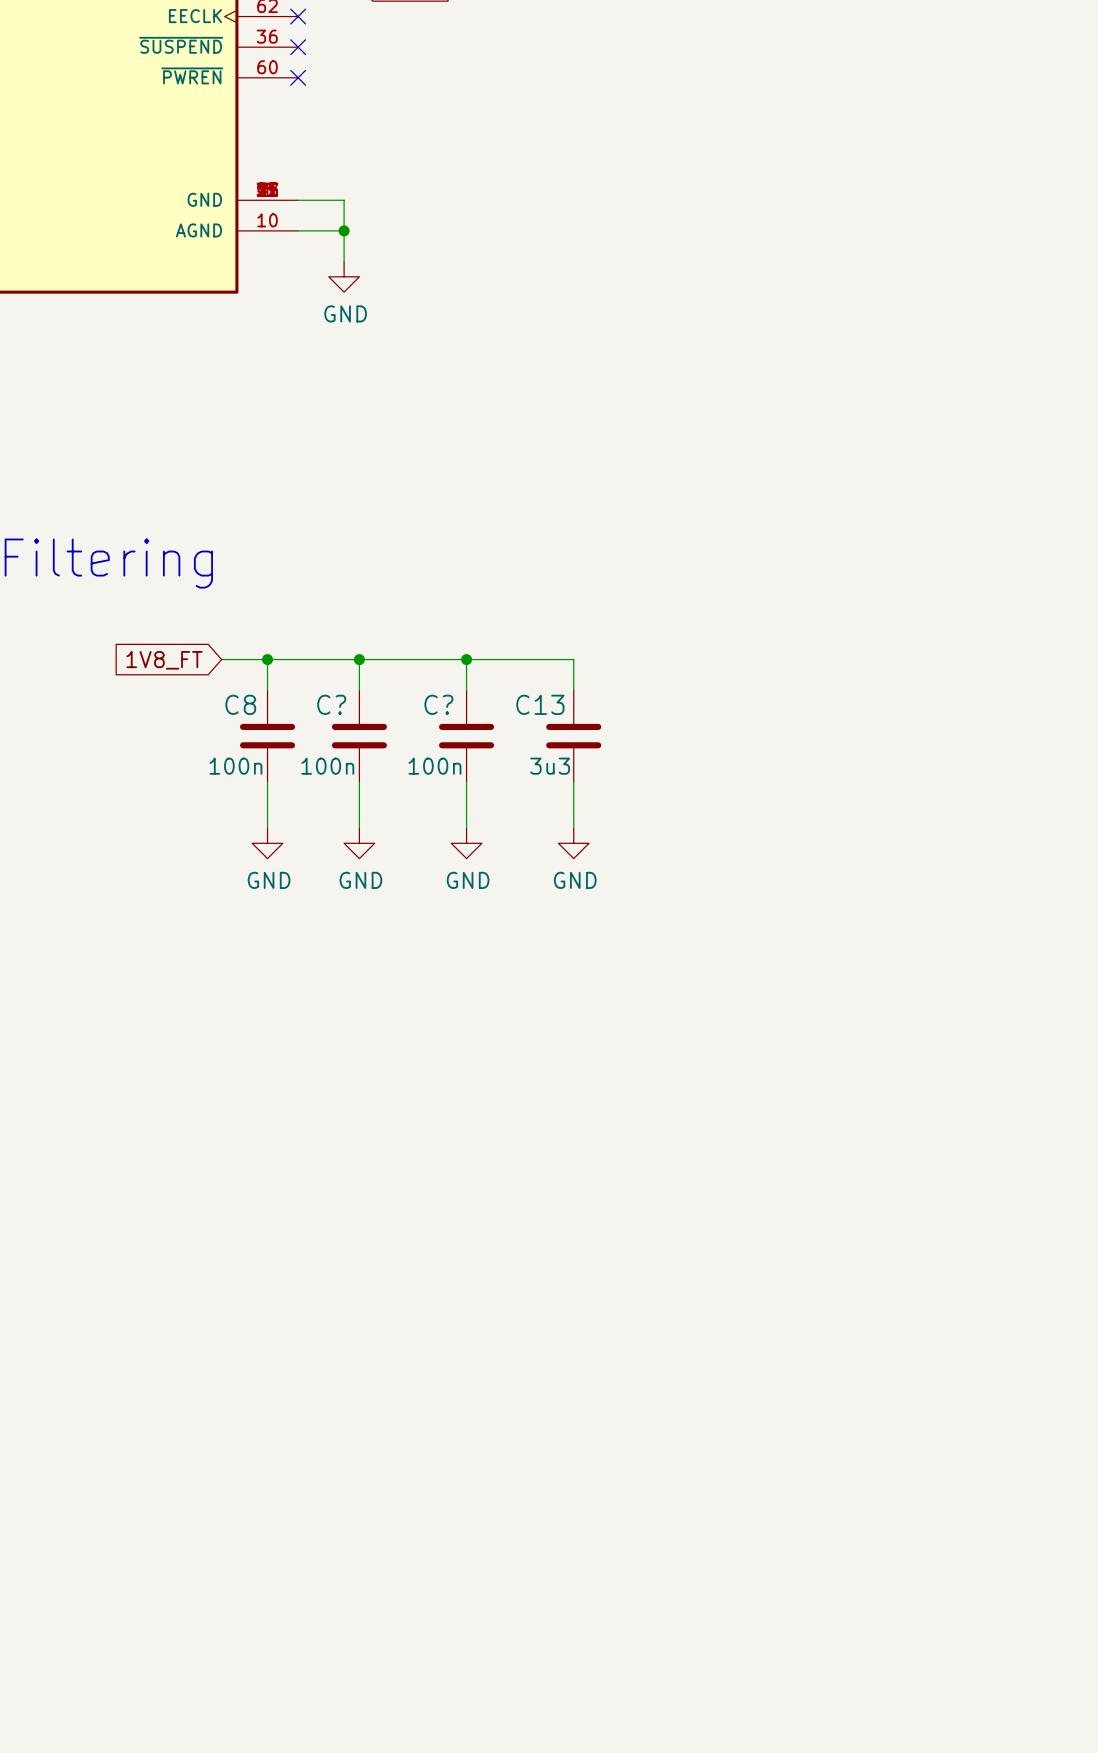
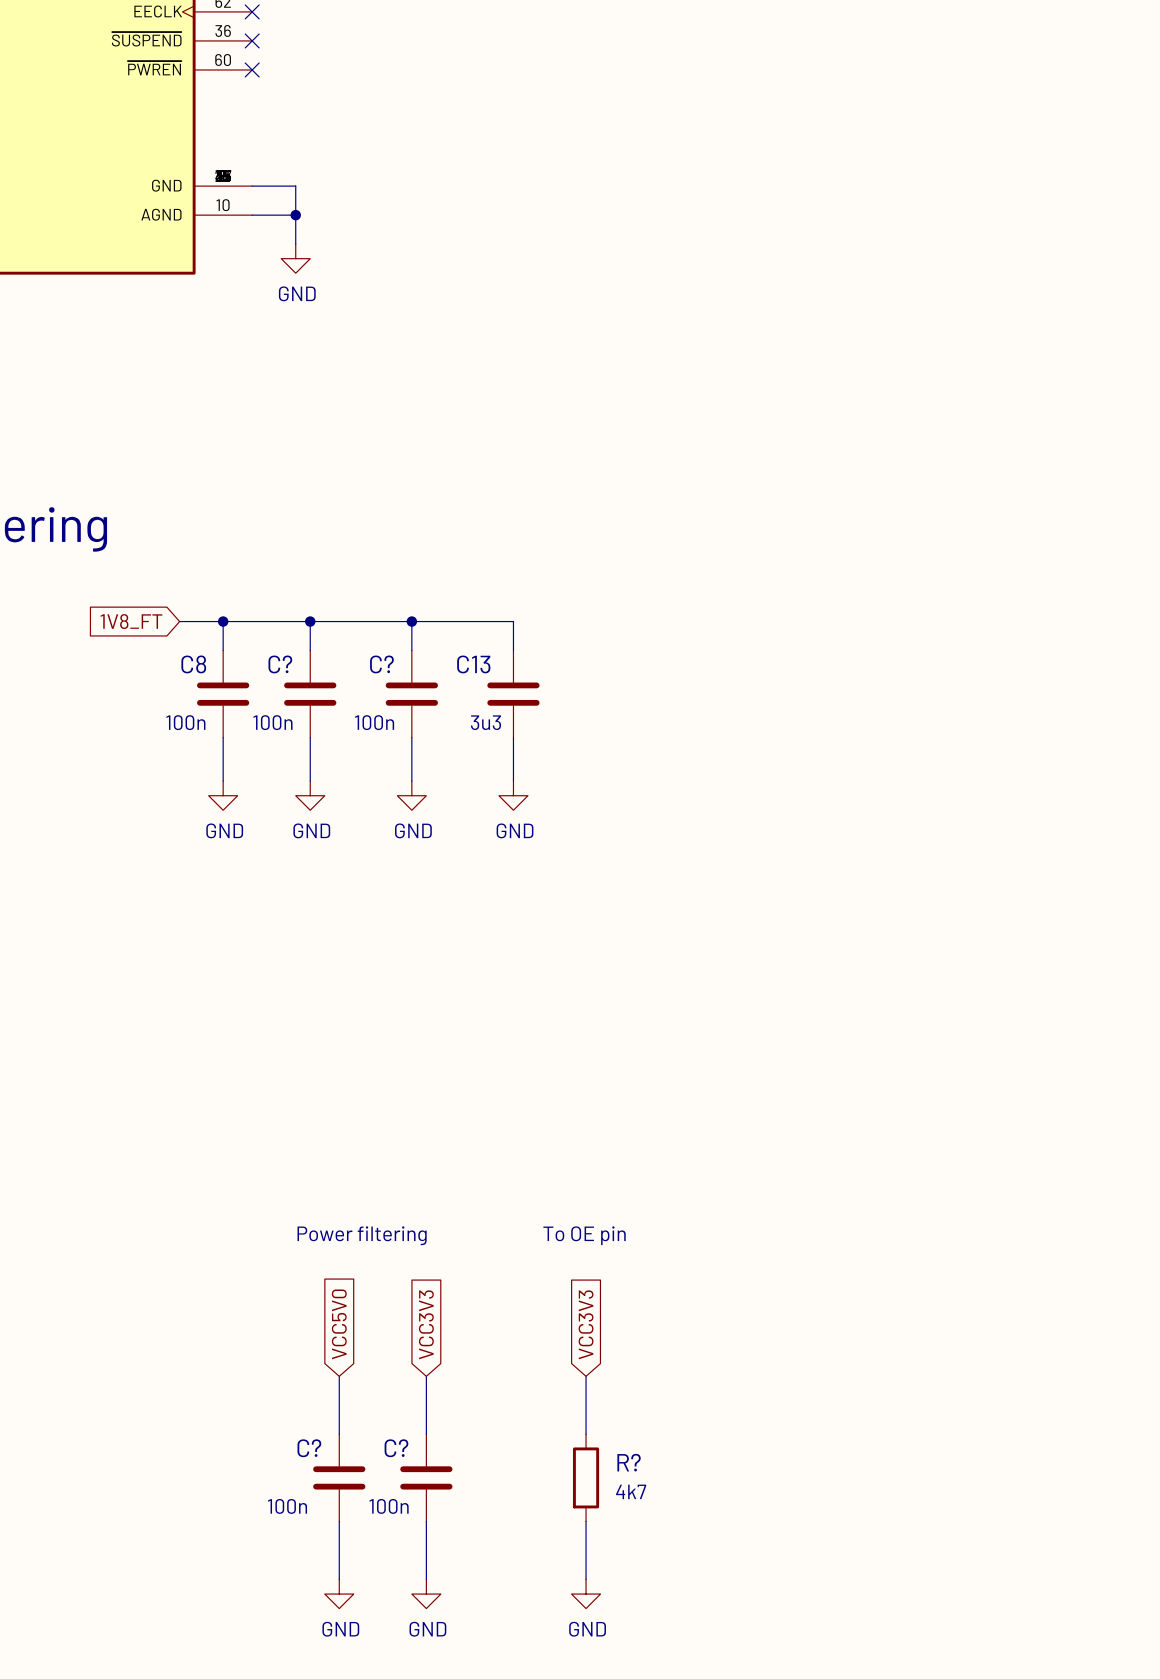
text: none -> Power filtering (362, 1235)
text: none -> To OE pin (584, 1235)
global label: none -> VCC5V0 (339, 1324)
global label: none -> VCC3V3 (426, 1324)
global label: none -> VCC3V3 (586, 1324)
wire: none -> (339, 1376) (339, 1434)
wire: none -> (426, 1376) (426, 1434)
wire: none -> (586, 1376) (586, 1434)
C?: none -> (339, 1477)
C?: none -> (426, 1477)
R?: none -> (586, 1477)
wire: none -> (339, 1521) (339, 1579)
wire: none -> (426, 1521) (426, 1579)
wire: none -> (586, 1521) (586, 1579)
power symbol: none -> GND (339, 1594)
power symbol: none -> GND (426, 1594)
power symbol: none -> GND (586, 1594)

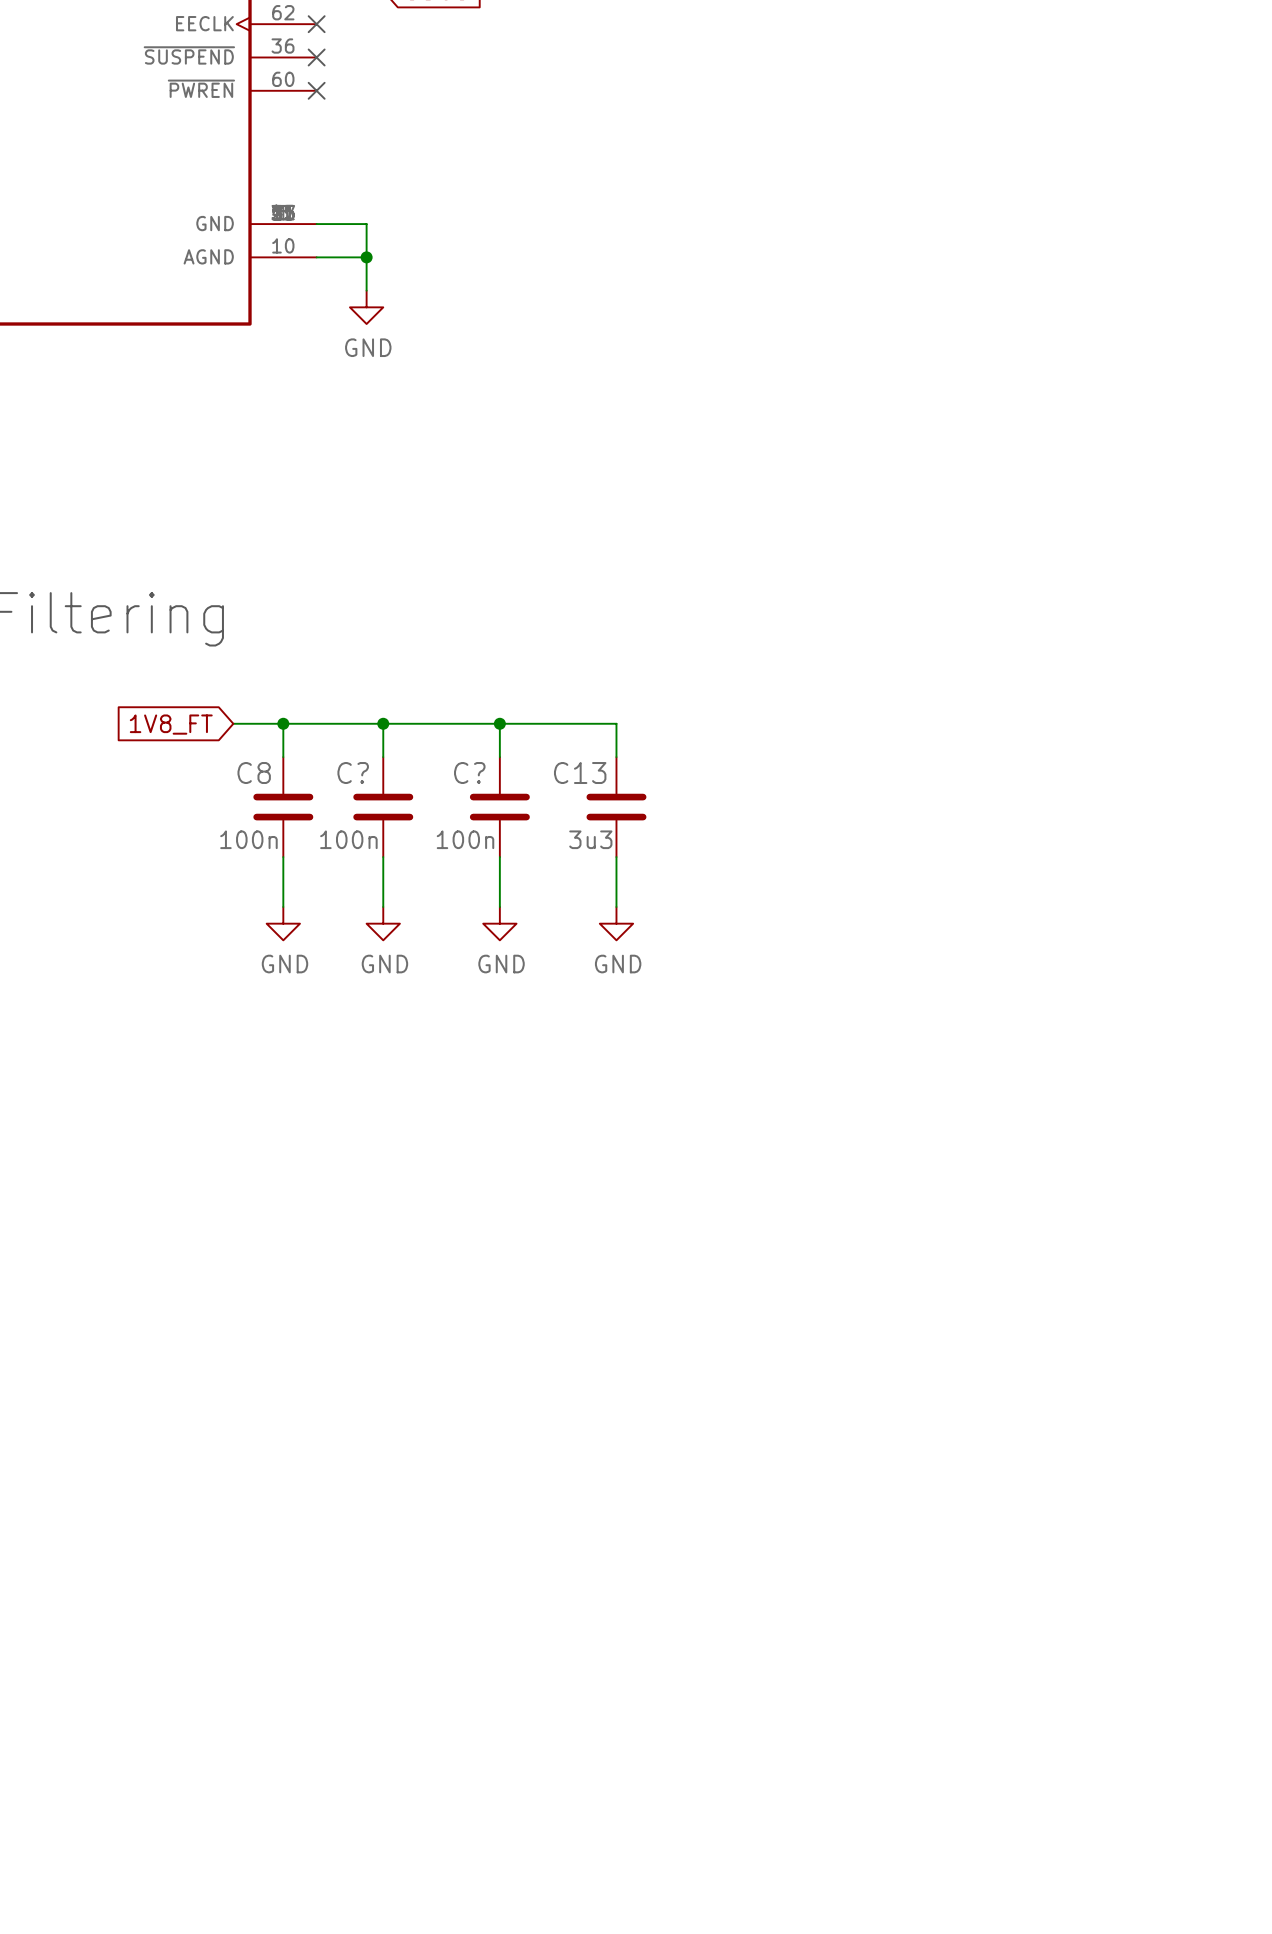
text: Power filtering (362, 1235) -> none
text: To OE pin (584, 1235) -> none
global label: VCC5V0 (339, 1324) -> none
global label: VCC3V3 (426, 1324) -> none
global label: VCC3V3 (586, 1324) -> none
wire: (339, 1376) (339, 1434) -> none
wire: (426, 1376) (426, 1434) -> none
wire: (586, 1376) (586, 1434) -> none
C?: (339, 1477) -> none
C?: (426, 1477) -> none
R?: (586, 1477) -> none
wire: (339, 1521) (339, 1579) -> none
wire: (426, 1521) (426, 1579) -> none
wire: (586, 1521) (586, 1579) -> none
power symbol: GND (339, 1594) -> none
power symbol: GND (426, 1594) -> none
power symbol: GND (586, 1594) -> none

